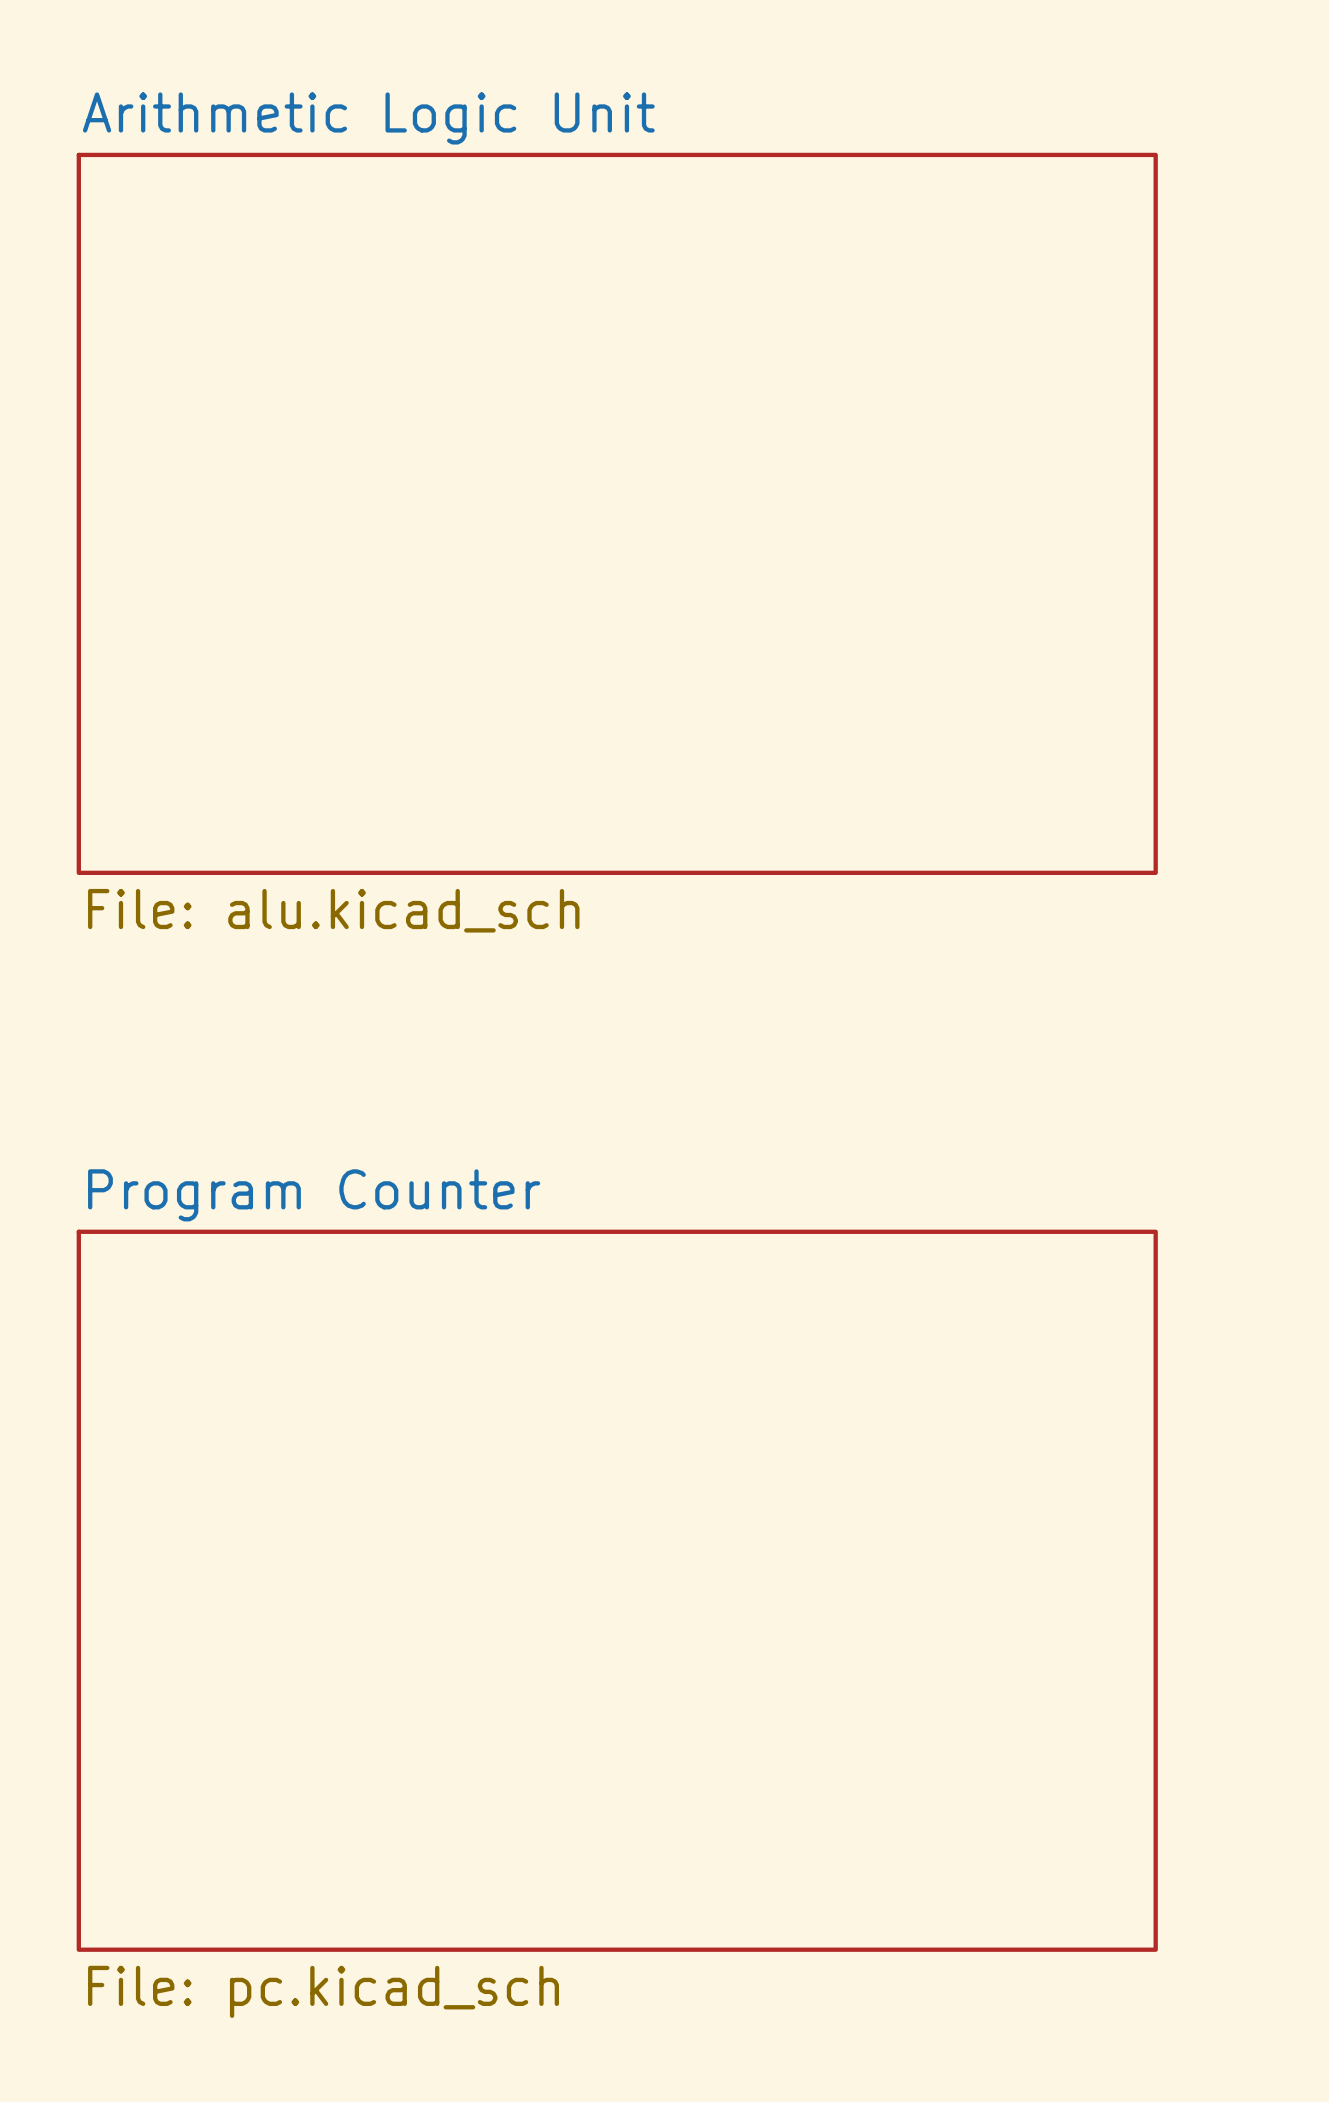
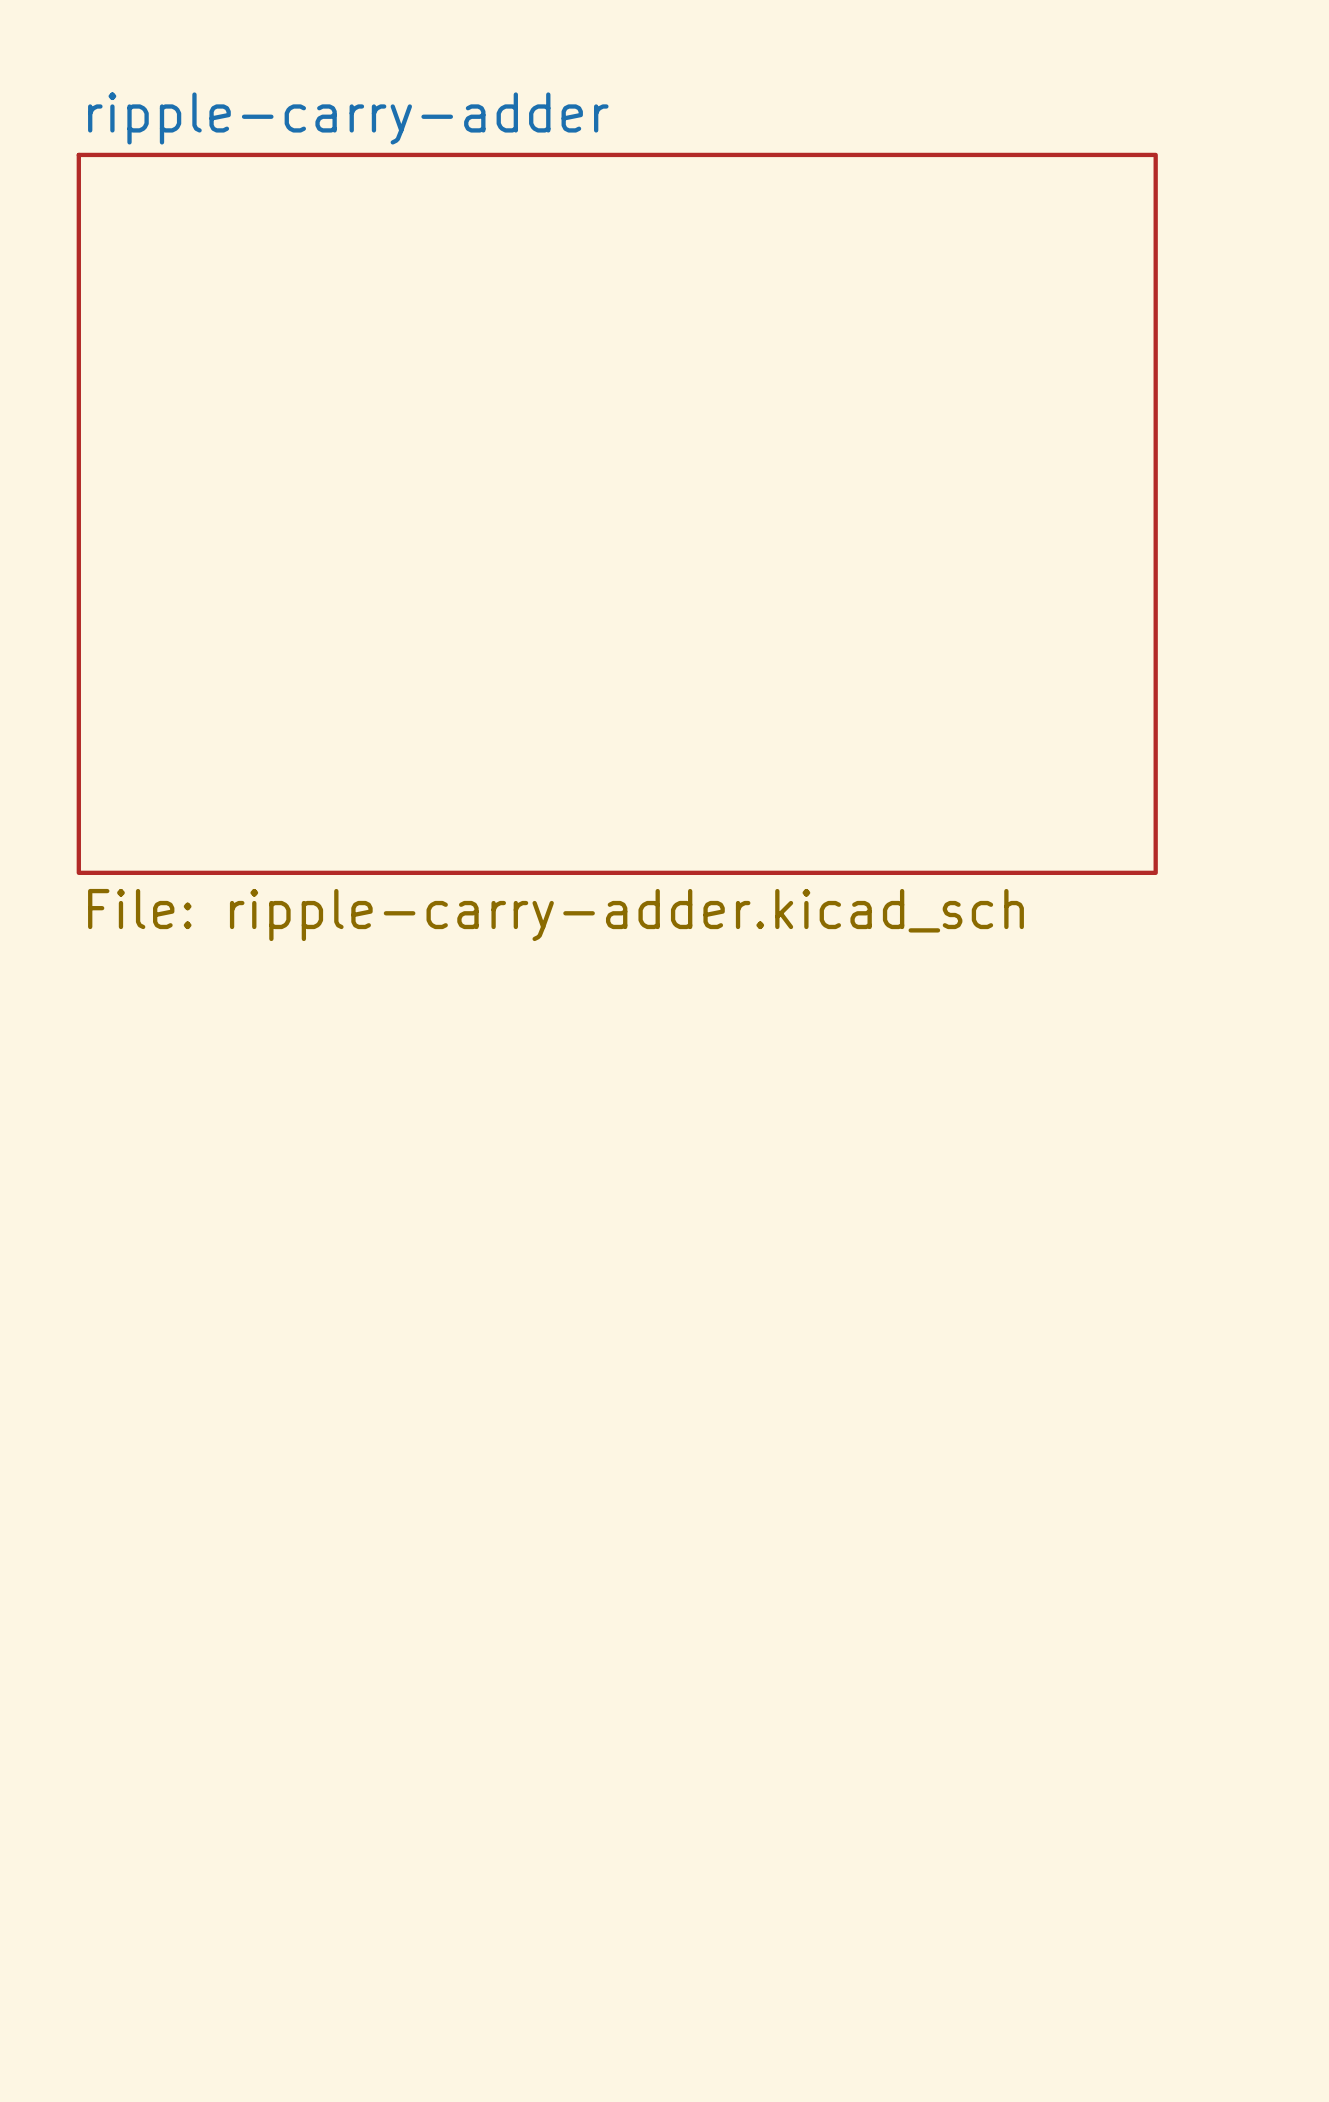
sheet Arithmetic Logic Unit name: Arithmetic Logic Unit (368, 118) -> ripple-carry-adder (348, 118)
sheet Arithmetic Logic Unit value: File: alu.kicad_sch (333, 910) -> File: ripple-carry-adder.kicad_sch (555, 915)
sheet Program Counter: File: pc.kicad_sch (617, 1590) -> none

